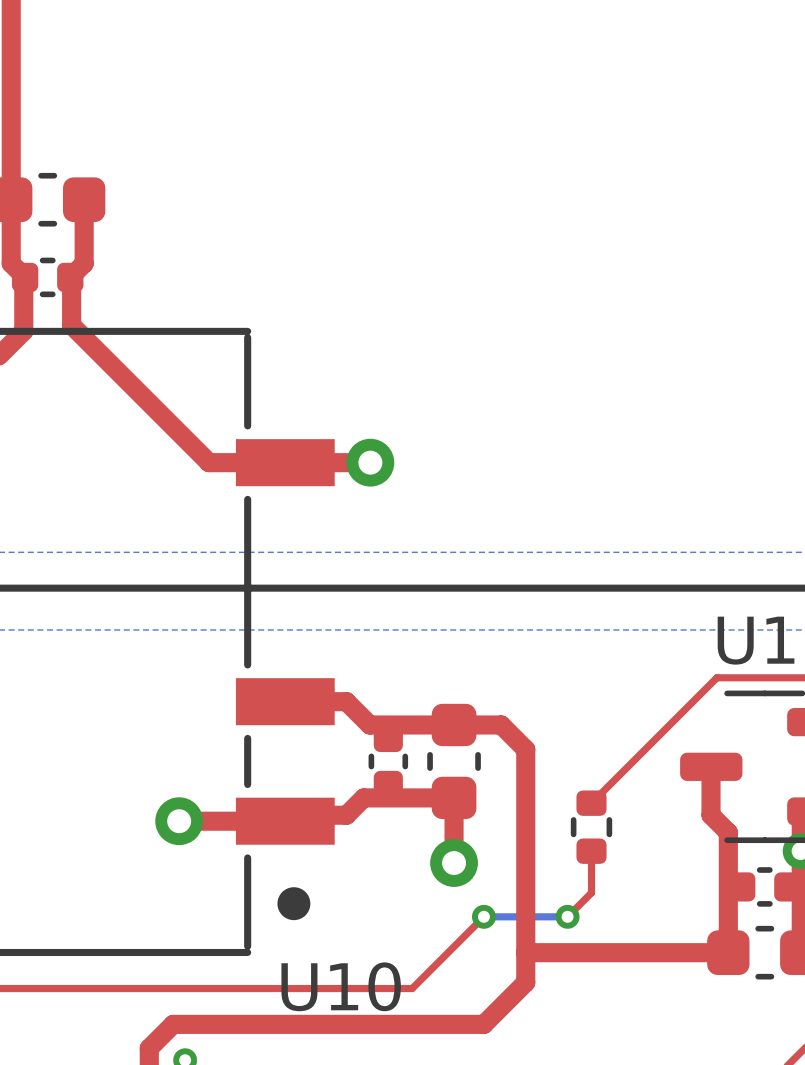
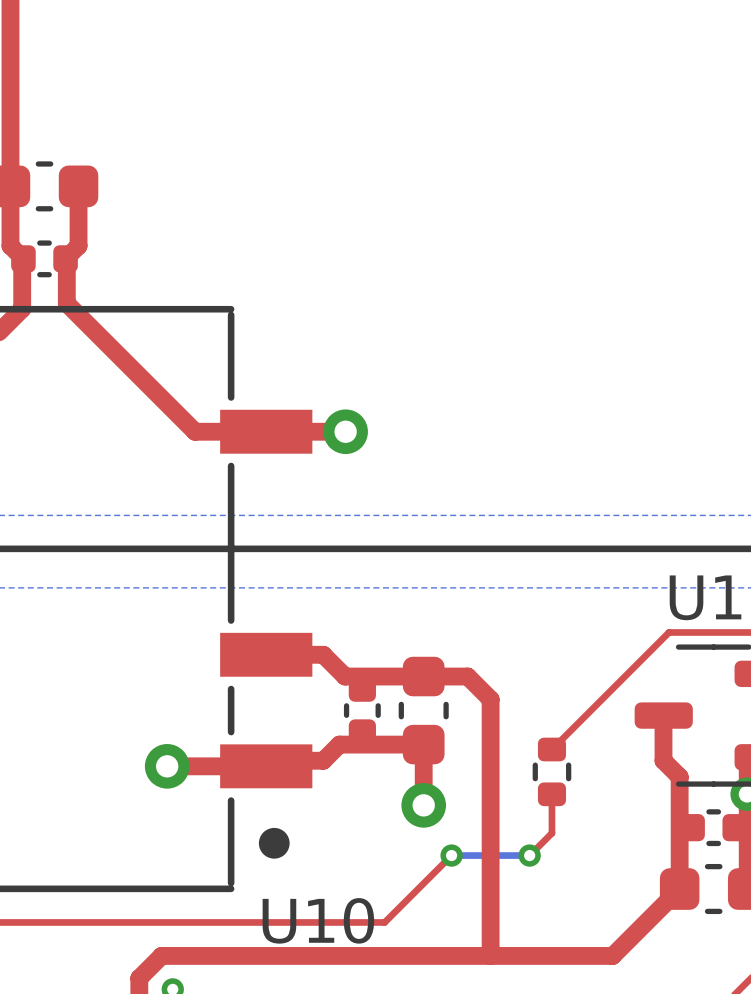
top track: (525, 952) (728, 952) -> (451, 955) (612, 955) (679, 889)
top track: (525, 982) (483, 1024) -> (490, 916) (490, 955)

